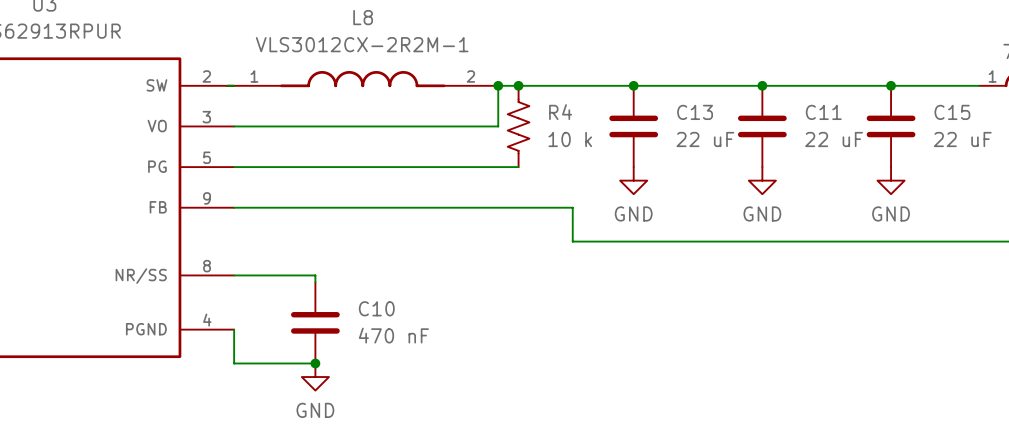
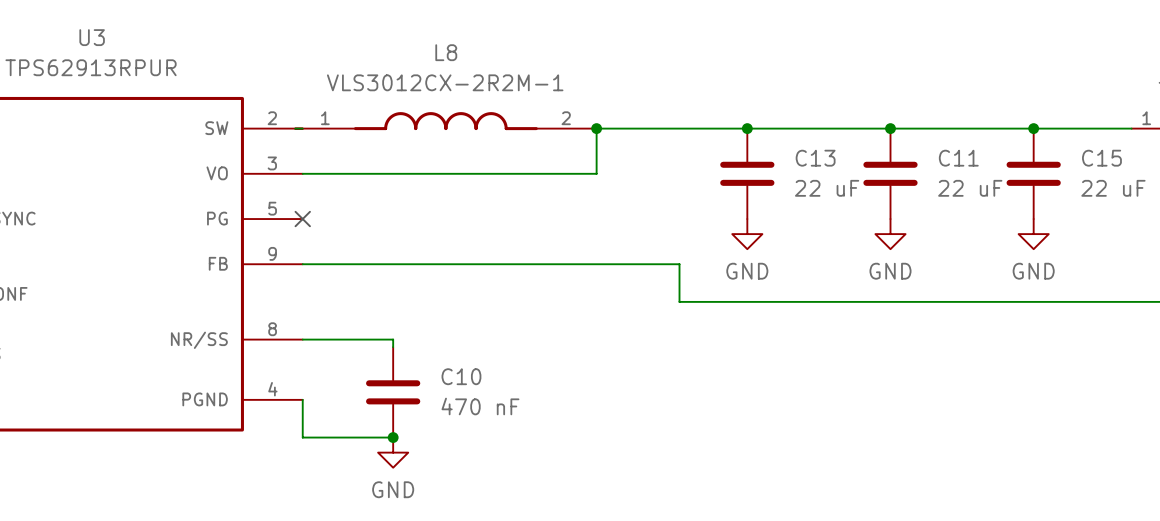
junction: (518, 85) -> none
R4: 10 k (518, 126) -> none
wire: (234, 167) (518, 167) -> none
no-connect mark: none -> (302, 219)

